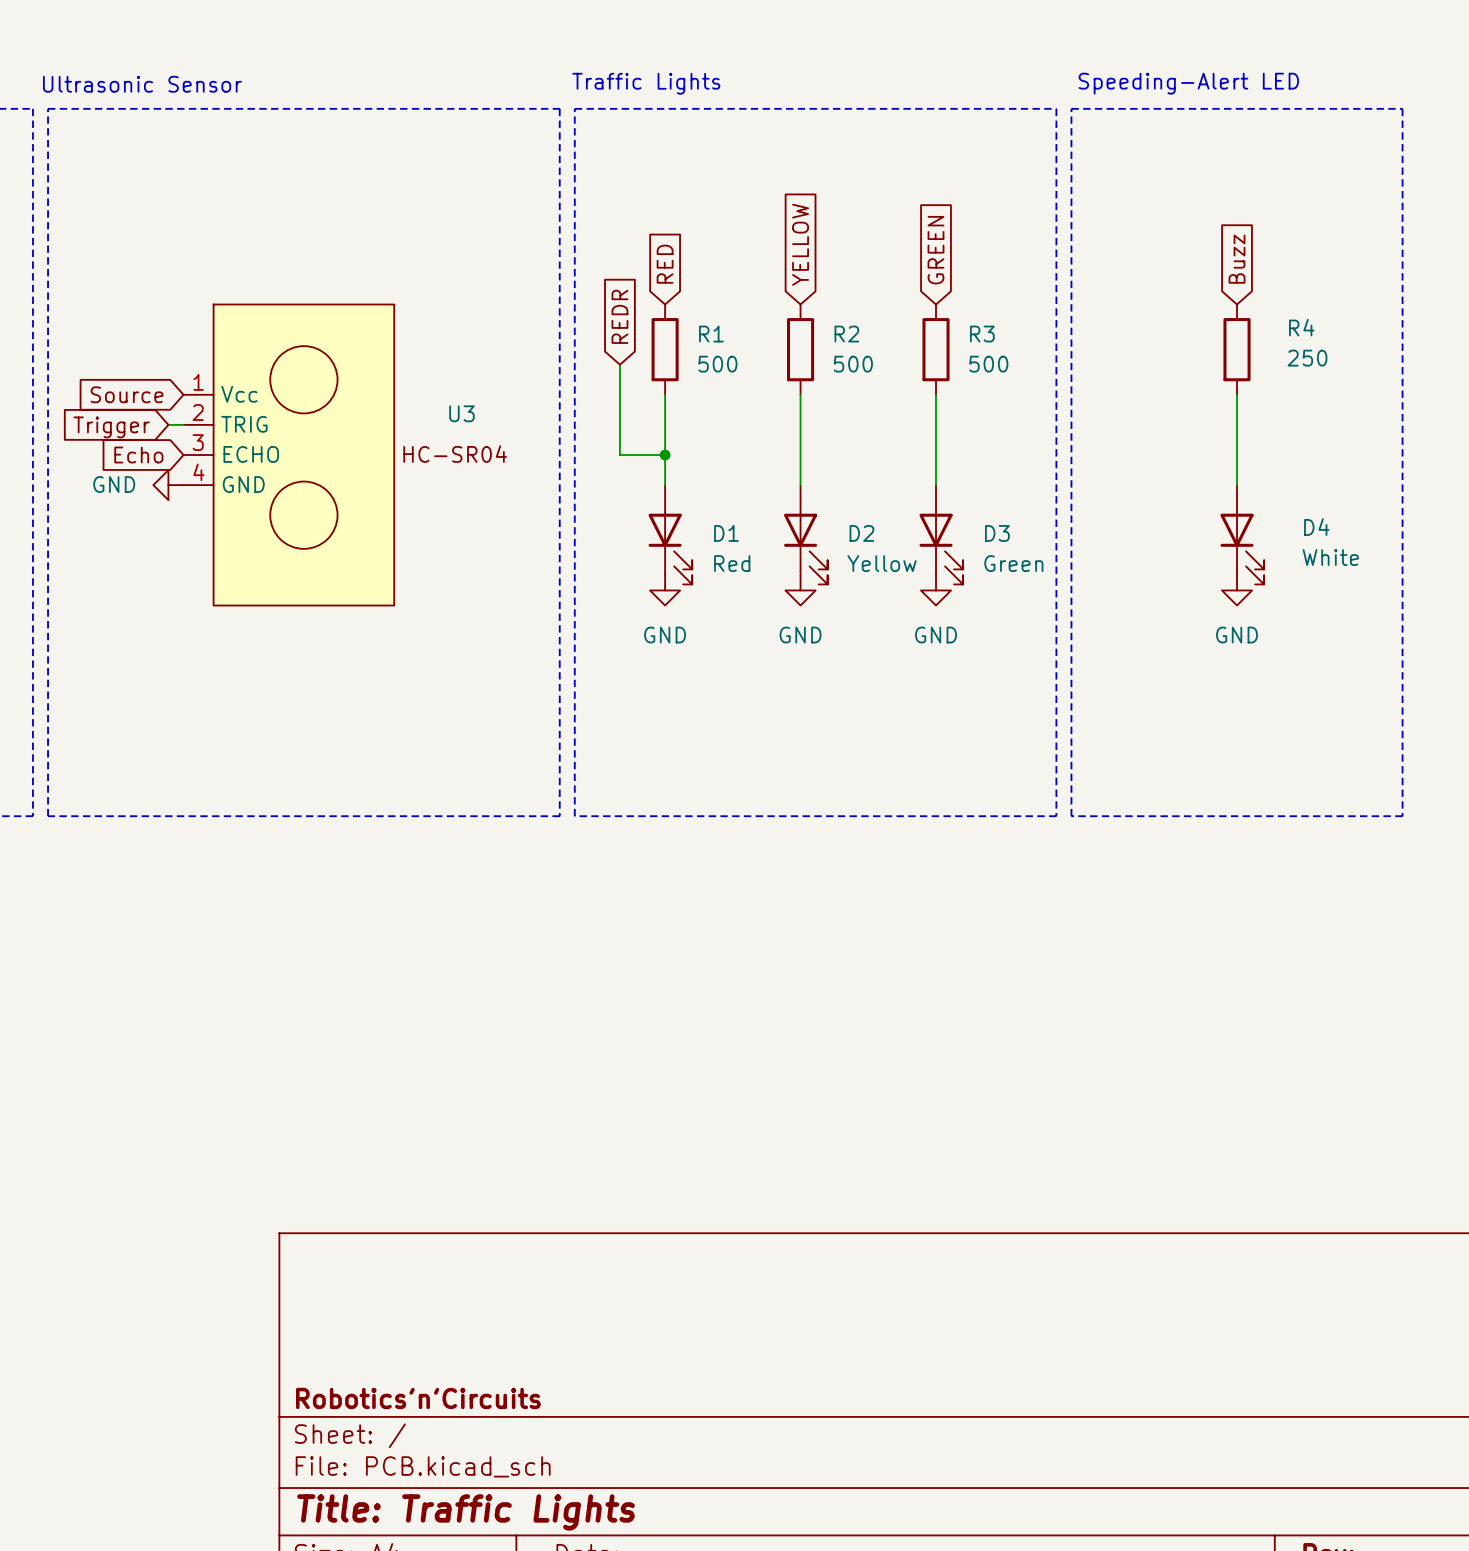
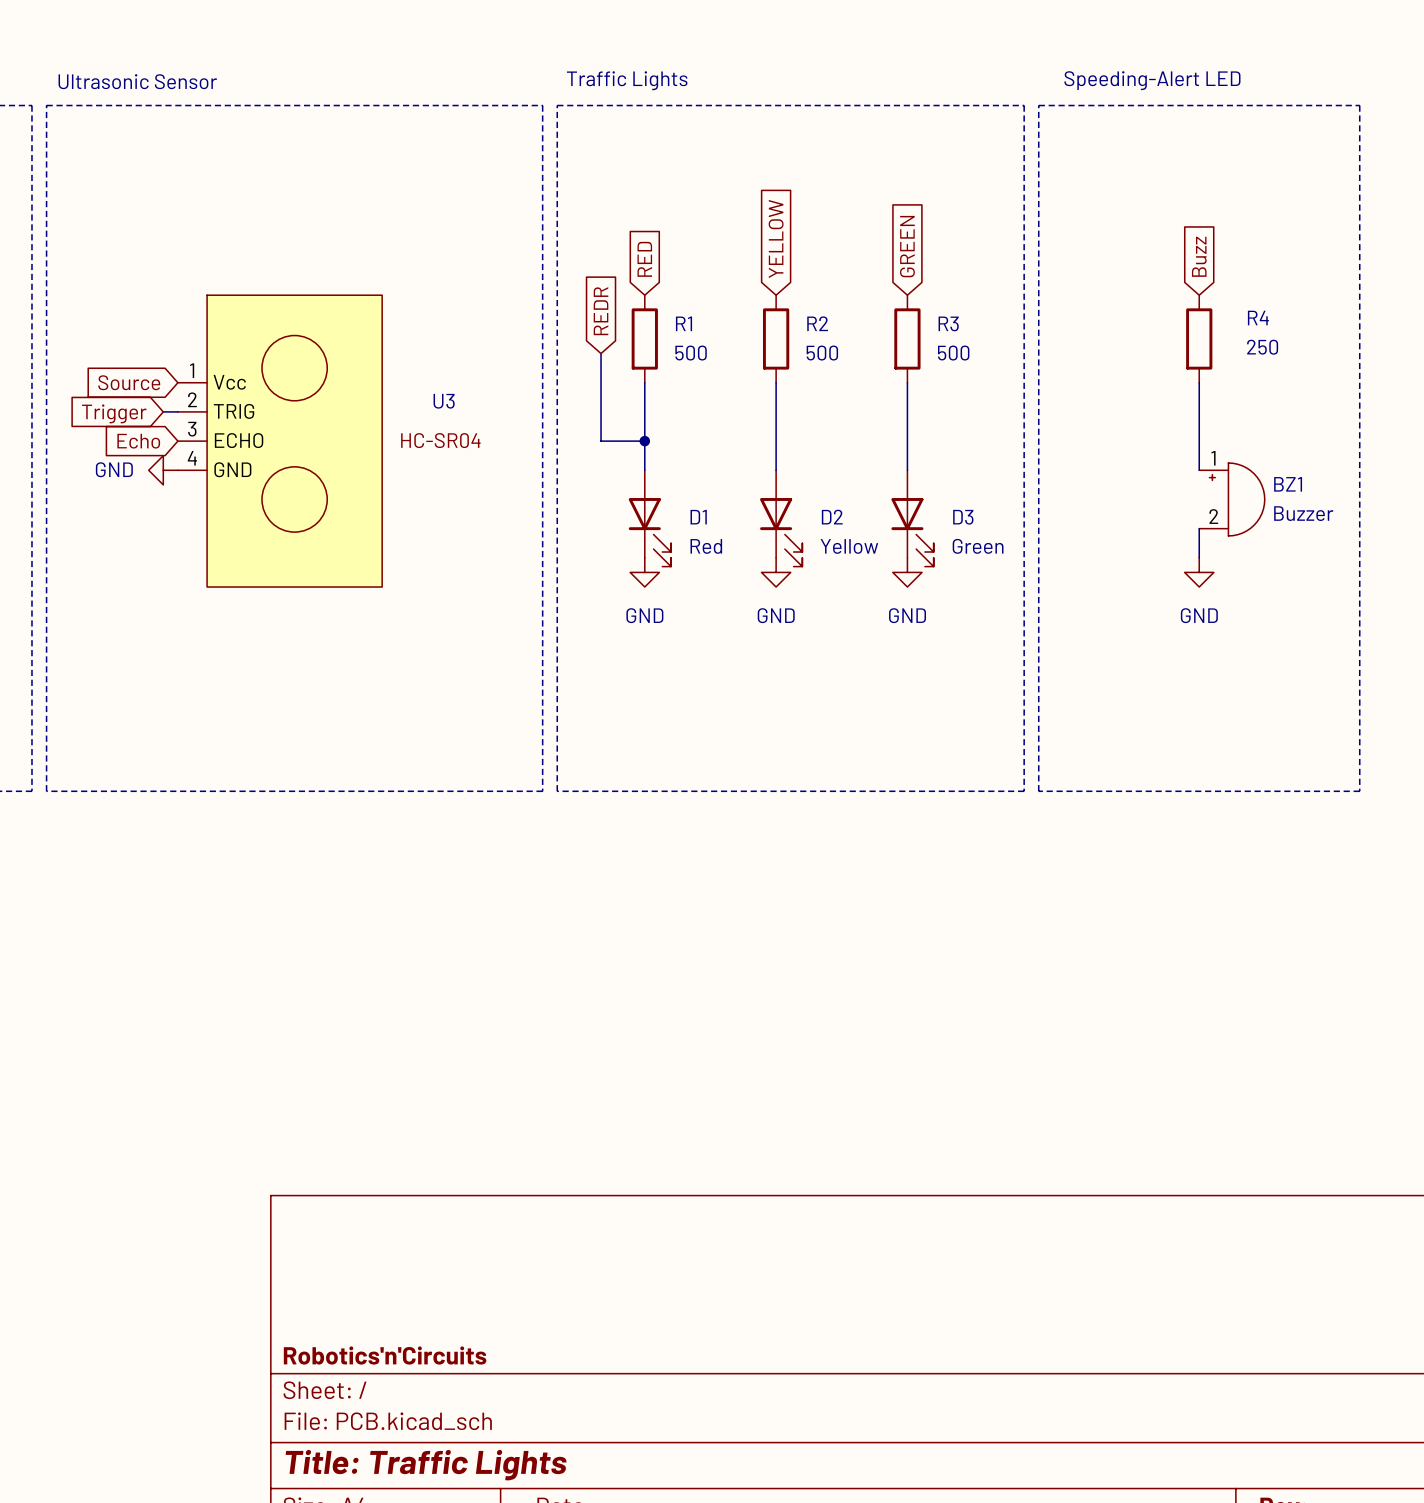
BZ1: none -> Buzzer (1231, 499)
D4: White (1242, 534) -> none

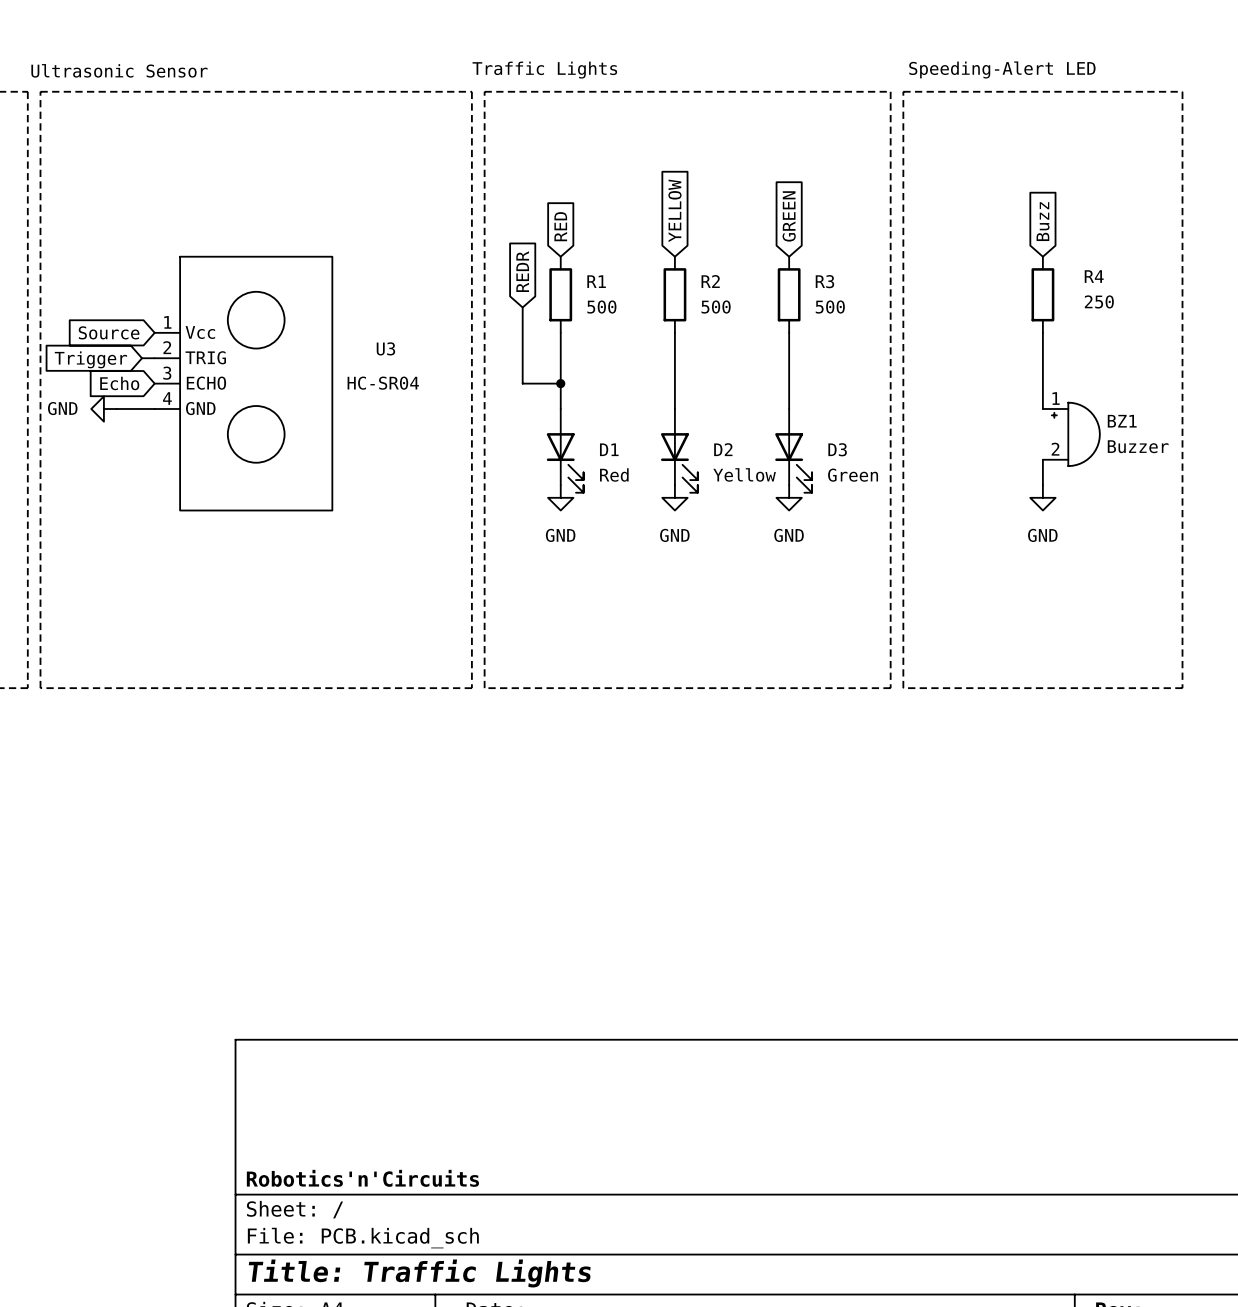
wire: none -> (116, 408) (154, 408)
power symbol position: GND (163, 470) -> GND (103, 408)

